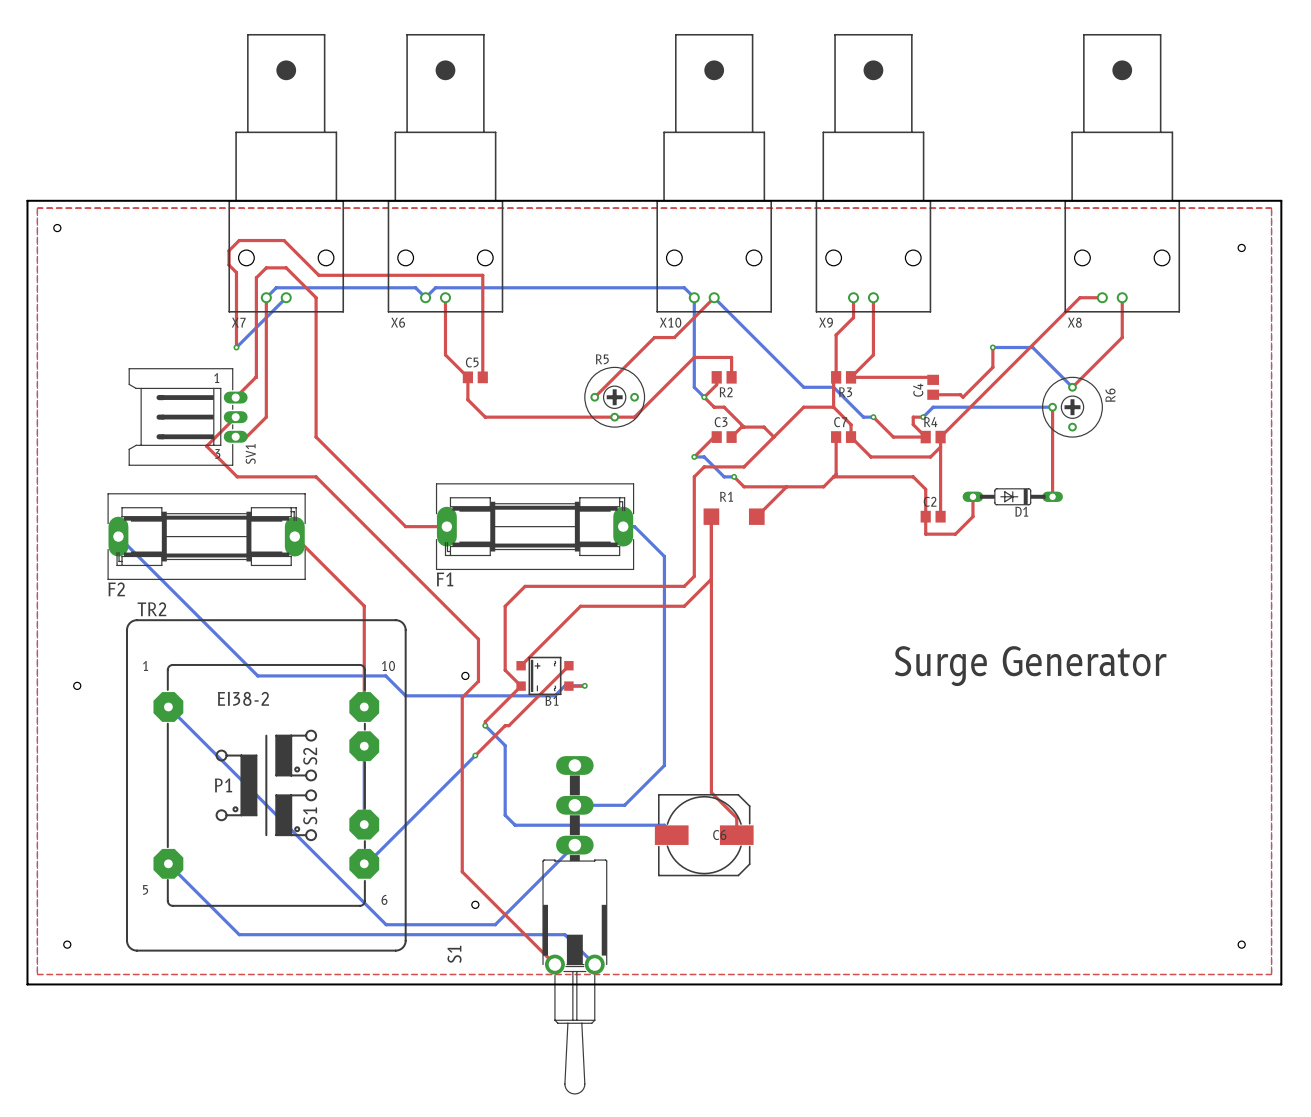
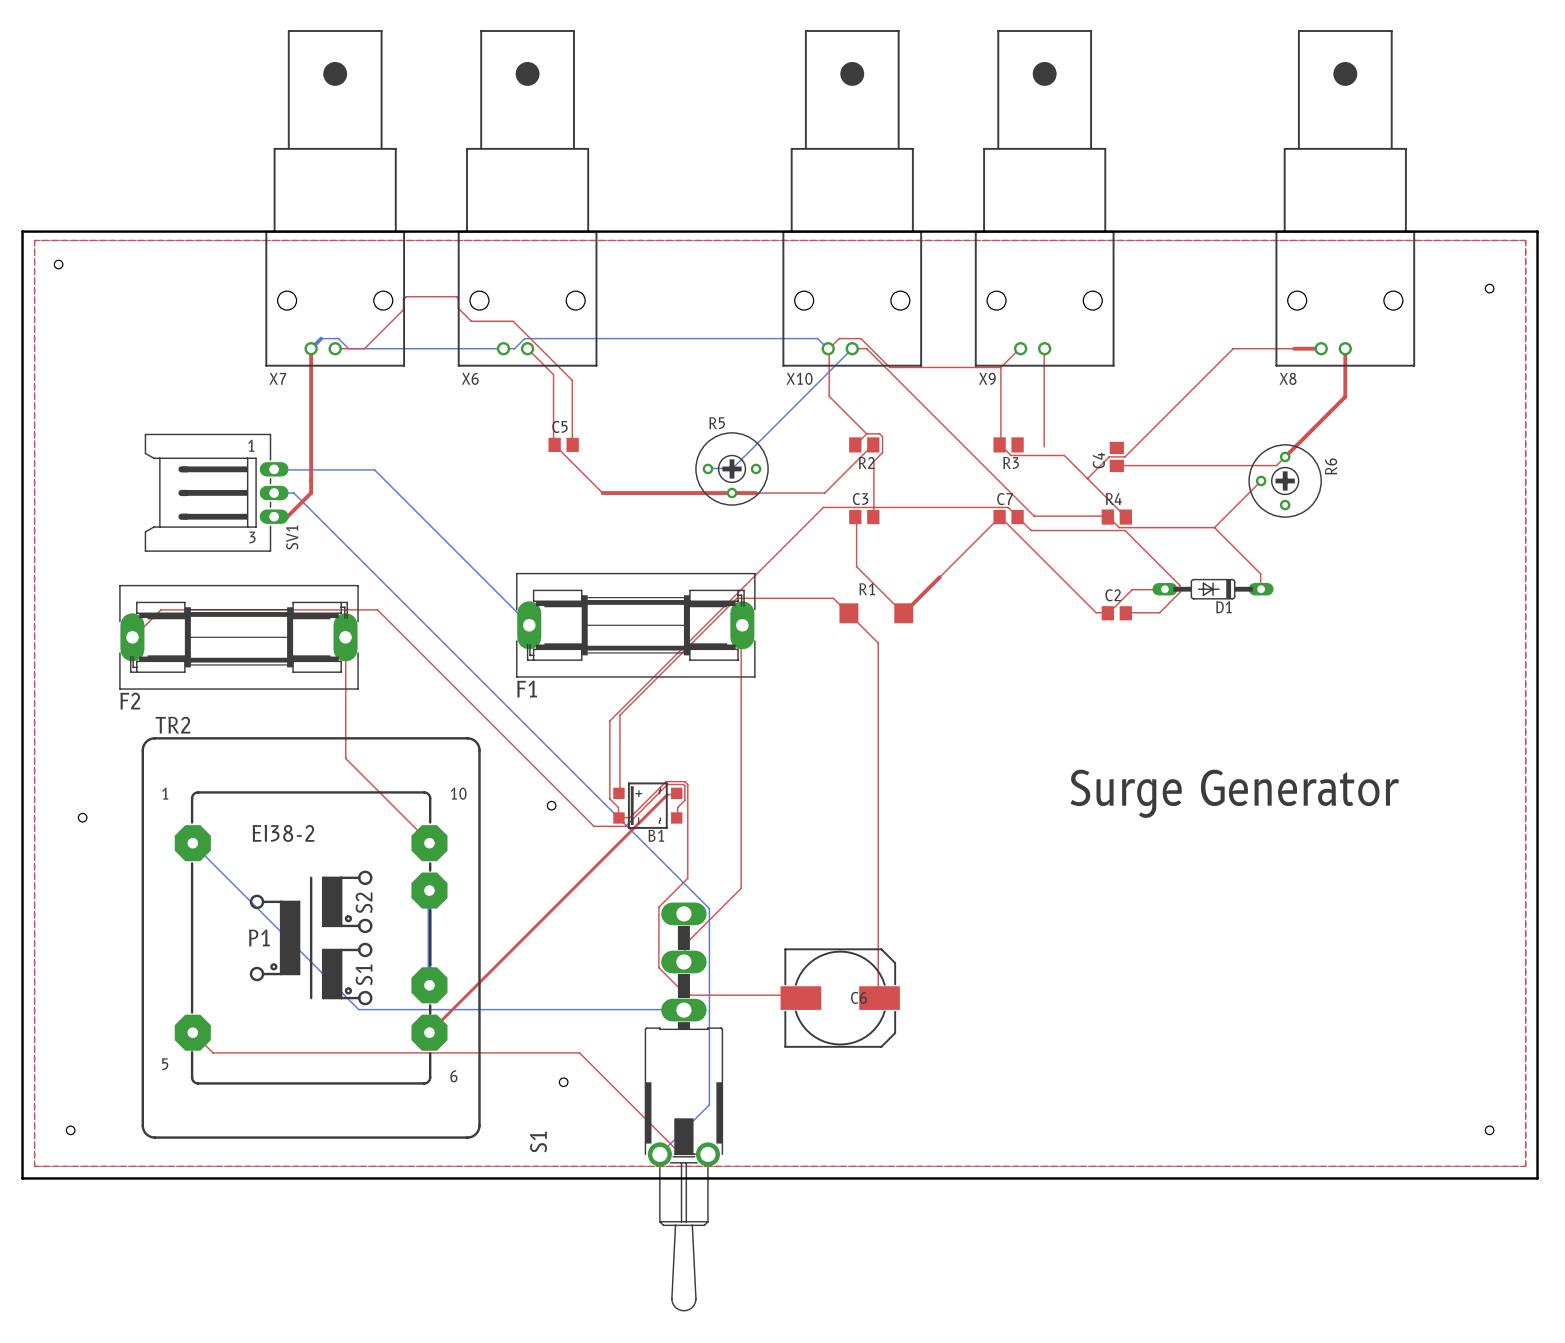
bottom track: (274, 289) (276, 287) (415, 287) (425, 297) (435, 287) (684, 287) (694, 297) (694, 387) (704, 397) -> (321, 338) (338, 338) (348, 348) (514, 348) (524, 338) (817, 338) (828, 348)
bottom track: (286, 297) (236, 347) -> none
top track: (445, 297) (445, 354) (467, 377) (467, 399) (485, 417) (507, 417) -> (527, 348) (553, 374) (553, 443) (602, 493)
top track: none -> (829, 348) (829, 396) (866, 433)
top track: none -> (829, 348) (839, 338) (860, 338) (889, 367) (1000, 367)
bottom track: (714, 297) (803, 387) (833, 387) (863, 417) (873, 417) -> (852, 348) (732, 468) (707, 468)
top track: (714, 297) (674, 337) (654, 337) (594, 397) -> (852, 348) (866, 348) (1034, 516) (1107, 516) (1119, 527) (1214, 527)
top track: (853, 297) (853, 317) (836, 335) (833, 407) -> (1020, 348) (1000, 367)
top track: (873, 297) (873, 354) (851, 377) (930, 377) (933, 379) -> (1044, 348) (1044, 446)
top track: (1079, 297) (940, 437) (940, 516) -> (1294, 348) (1233, 348) (1125, 456) (1109, 456) (1087, 478)
top track: none -> (1000, 367) (999, 444) (1011, 455) (1064, 455) (1125, 517)
top track: (236, 347) (236, 272) (229, 265) (229, 250) (239, 240) (284, 240) (318, 275) (482, 275) (482, 377) -> (335, 348) (364, 348) (403, 309) (403, 299) (406, 296) (456, 296) (458, 308) (471, 321) (513, 321) (572, 380) (572, 444)
via: (236, 347) -> none
bottom track: (992, 347) (1032, 347) (1072, 387) -> none
top track: (992, 347) (992, 367) (963, 397) (960, 394) (933, 394) -> (1285, 456) (1276, 465) (1116, 465)
via: (992, 347) -> none
top track: (716, 377) (716, 384) (704, 397) (714, 407) (724, 407) (744, 427) -> (855, 444) (866, 433)
top track: (731, 377) (731, 357) (694, 357) (634, 417) -> (873, 444) (824, 493) (756, 493)
bottom track: none -> (274, 469) (374, 469) (529, 625)
top track: (235, 397) (256, 377) (256, 277) (266, 267) (286, 267) (316, 297) (316, 437) (405, 526) (446, 526) -> none
via: (704, 397) -> none
top track: (833, 407) (851, 424) (851, 437) (870, 456) (930, 456) (940, 447) -> none
top track: (833, 407) (803, 407) (744, 466) (704, 466) (694, 476) (694, 576) (684, 586) (525, 586) (505, 606) (505, 670) (521, 686) (485, 721) (485, 725) -> none
bottom track: (1052, 407) (933, 407) (923, 417) -> none
top track: (1052, 407) (1052, 496) -> (1214, 527) (1260, 573) (1261, 589)
top track: none -> (1261, 480) (1214, 527)
bottom track: none -> (274, 493) (293, 493) (709, 908) (709, 1104) (659, 1154)
top track: (235, 417) (206, 446) (237, 476) (316, 476) (478, 639) (478, 681) (462, 697) (462, 871) (554, 964) -> none
top track: (873, 417) (893, 437) (925, 437) (913, 424) (913, 417) (923, 417) -> none
via: (873, 417) -> none
via: (923, 417) -> none
top track: (716, 437) (714, 437) (694, 456) -> (855, 517) (856, 566) (903, 613)
top track: (731, 437) (741, 427) (763, 427) (773, 437) -> (873, 517) (873, 461) (882, 452) (882, 436) (879, 433) (866, 433)
top track: (836, 437) (836, 474) (823, 486) (744, 486) (734, 476) -> none
bottom track: (694, 456) (704, 456) (724, 476) (734, 476) -> none
via: (694, 456) -> none
via: (734, 476) -> none
top track: (833, 476) (913, 476) (925, 489) (925, 534) (955, 534) (972, 516) (972, 496) -> (904, 612) (999, 517) (1096, 612) (1109, 612) (1132, 589) (1164, 589)
top track: (711, 516) (711, 792) (736, 817) (736, 835) -> (618, 793) (619, 715) (736, 598) (833, 598) (878, 643) (879, 998)
top track: none -> (1125, 613) (1159, 612) (1179, 592) (1179, 585) (1125, 530) (1031, 530) (1008, 507) (823, 507) (609, 721) (609, 798) (618, 807) (618, 817) (630, 817) (666, 781) (684, 781) (687, 784) (687, 878) (658, 907) (658, 967) (686, 995) (797, 995) (800, 998)
bottom track: (623, 526) (634, 526) (664, 556) (664, 765) (624, 805) (574, 805) -> none
top track: none -> (742, 625) (741, 888) (684, 944) (683, 961)
bottom track: (118, 536) (257, 675) (385, 675) (405, 695) (554, 695) (564, 685) (584, 685) -> none
top track: (294, 536) (364, 606) (364, 706) -> (345, 637) (345, 758) (429, 842)
top track: (711, 579) (684, 606) (580, 606) (521, 665) -> none
top track: (568, 665) (508, 725) (505, 725) (475, 755) -> (676, 793) (667, 794) (429, 1032)
top track: (584, 685) (568, 686) -> (132, 637) (161, 609) (377, 609) (593, 826) (625, 826) (667, 784) (684, 785) (684, 800) (677, 807) (676, 817)
via: (584, 685) -> none
bottom track: (168, 706) (386, 924) (495, 924) (574, 845) -> (192, 843) (358, 1009) (683, 1010)
bottom track: (485, 725) (505, 745) (505, 815) (515, 825) (664, 825) (674, 835) -> none
via: (485, 725) -> none
bottom track: (475, 755) (367, 863) (364, 863) -> none
via: (475, 755) -> none
bottom track: (168, 863) (239, 934) (564, 934) (594, 964) -> none
top track: none -> (192, 1032) (213, 1052) (579, 1052) (680, 1153) (707, 1154)

